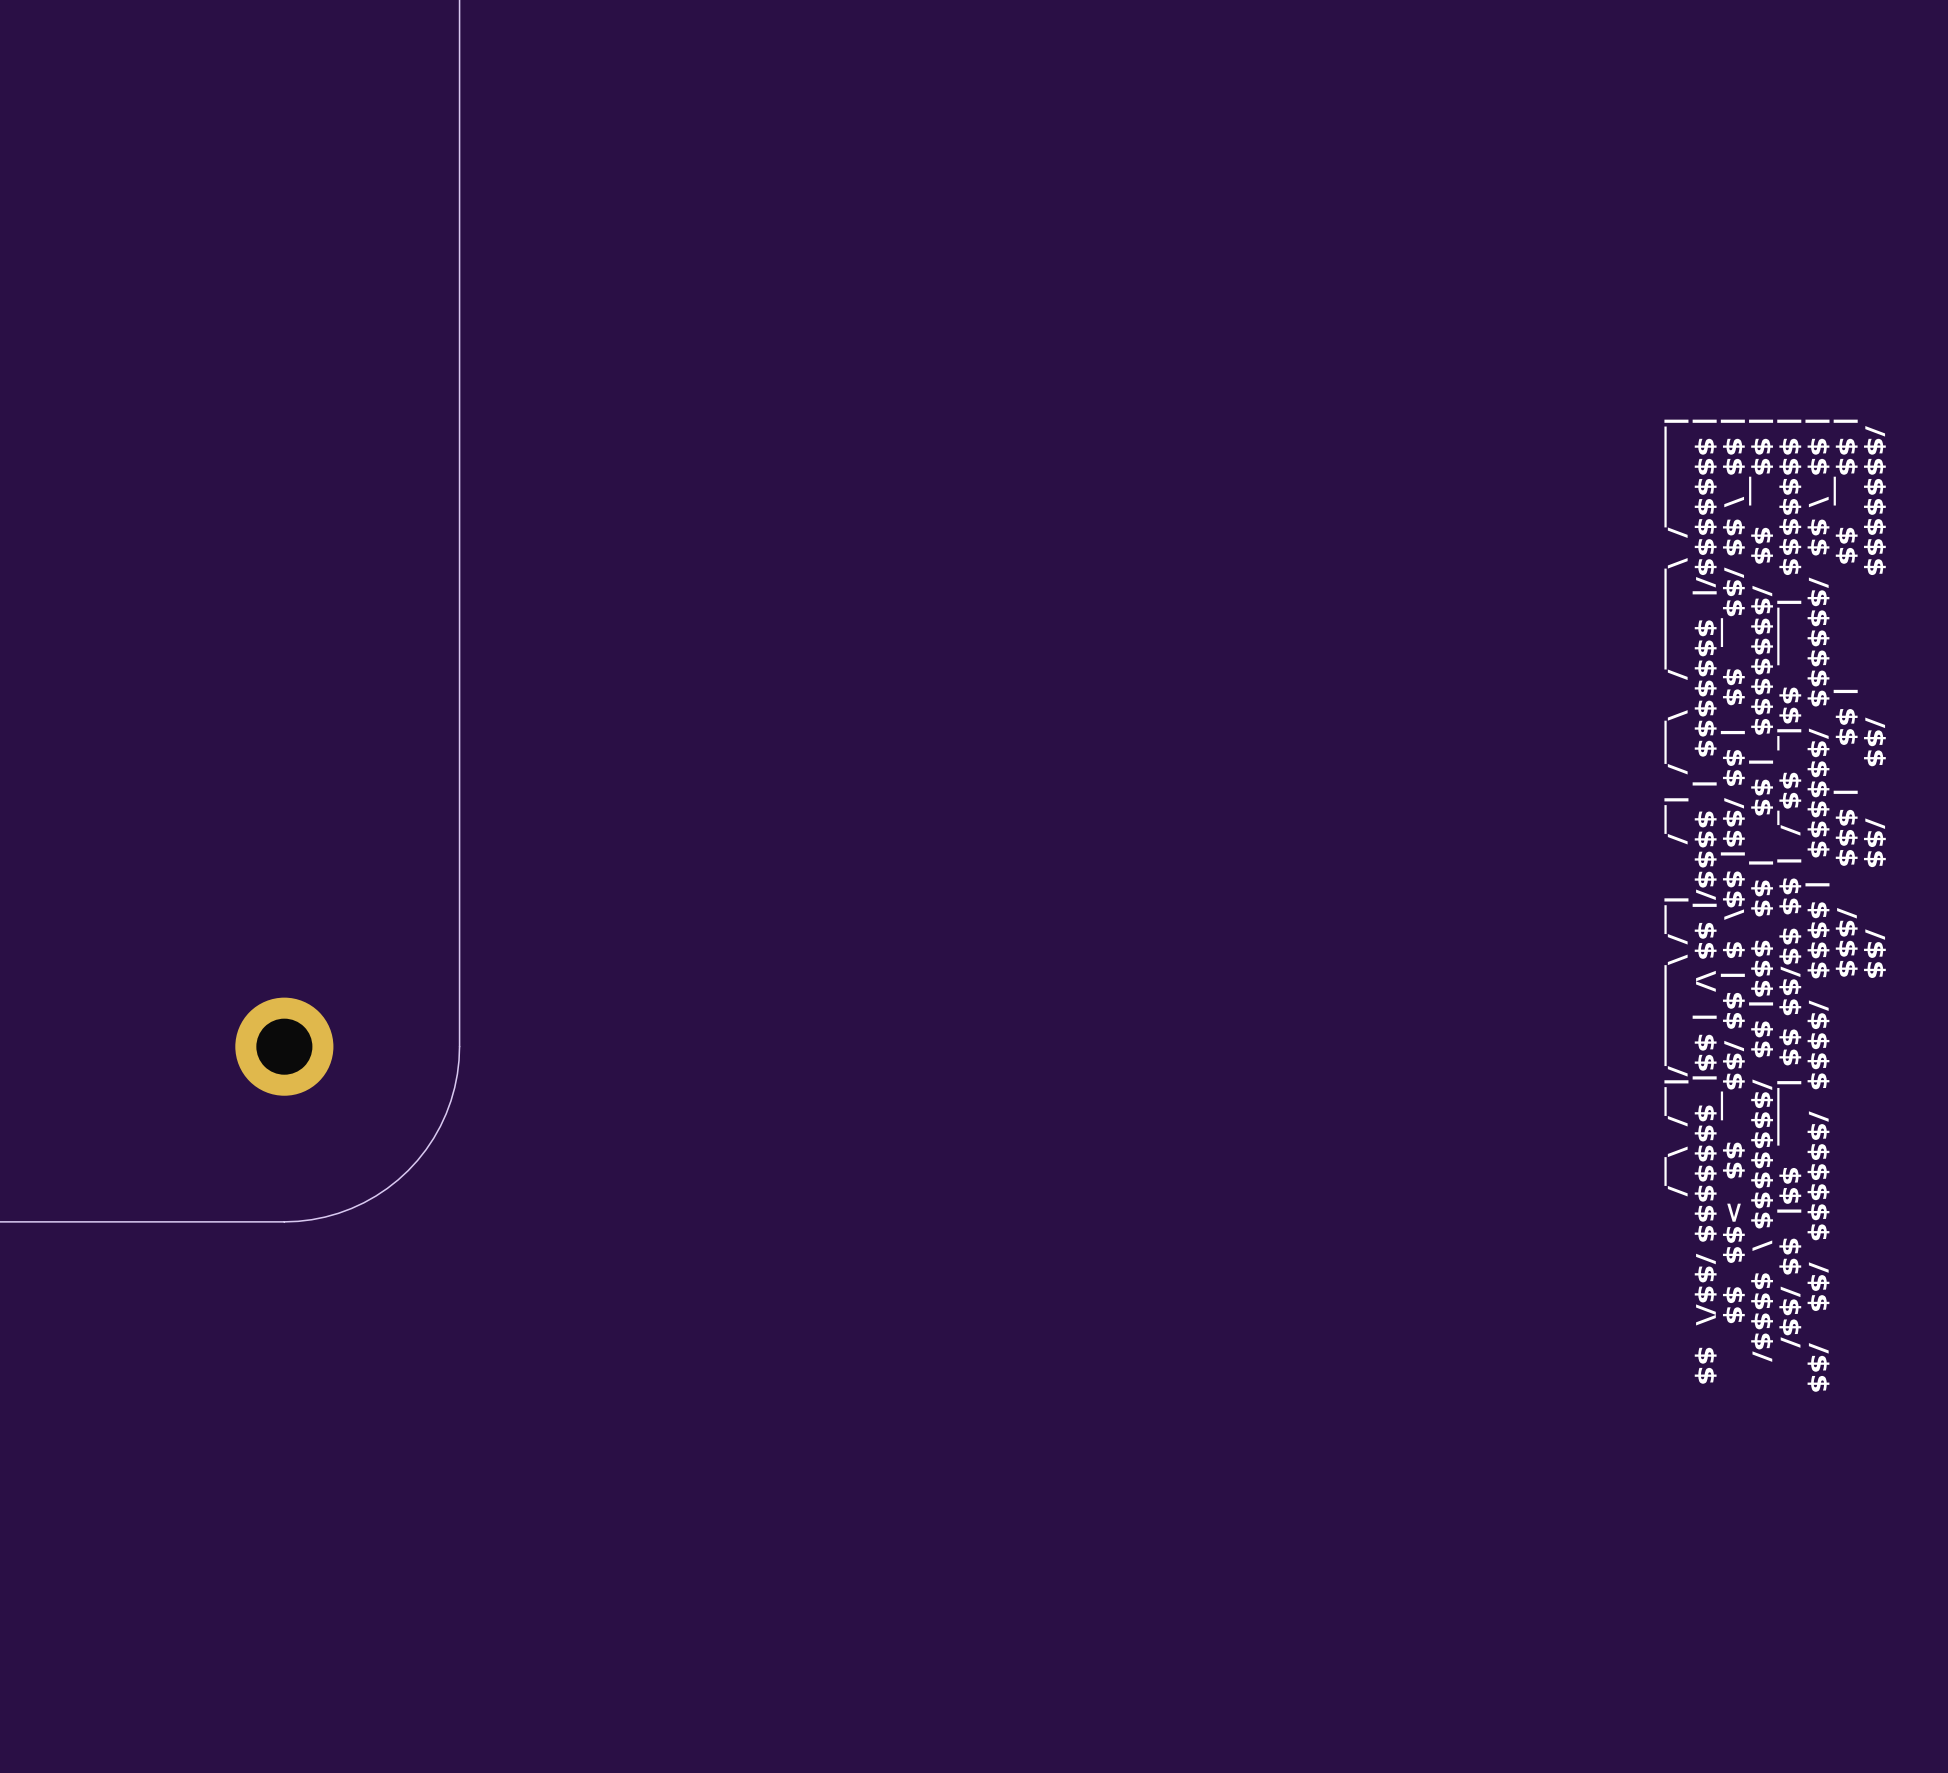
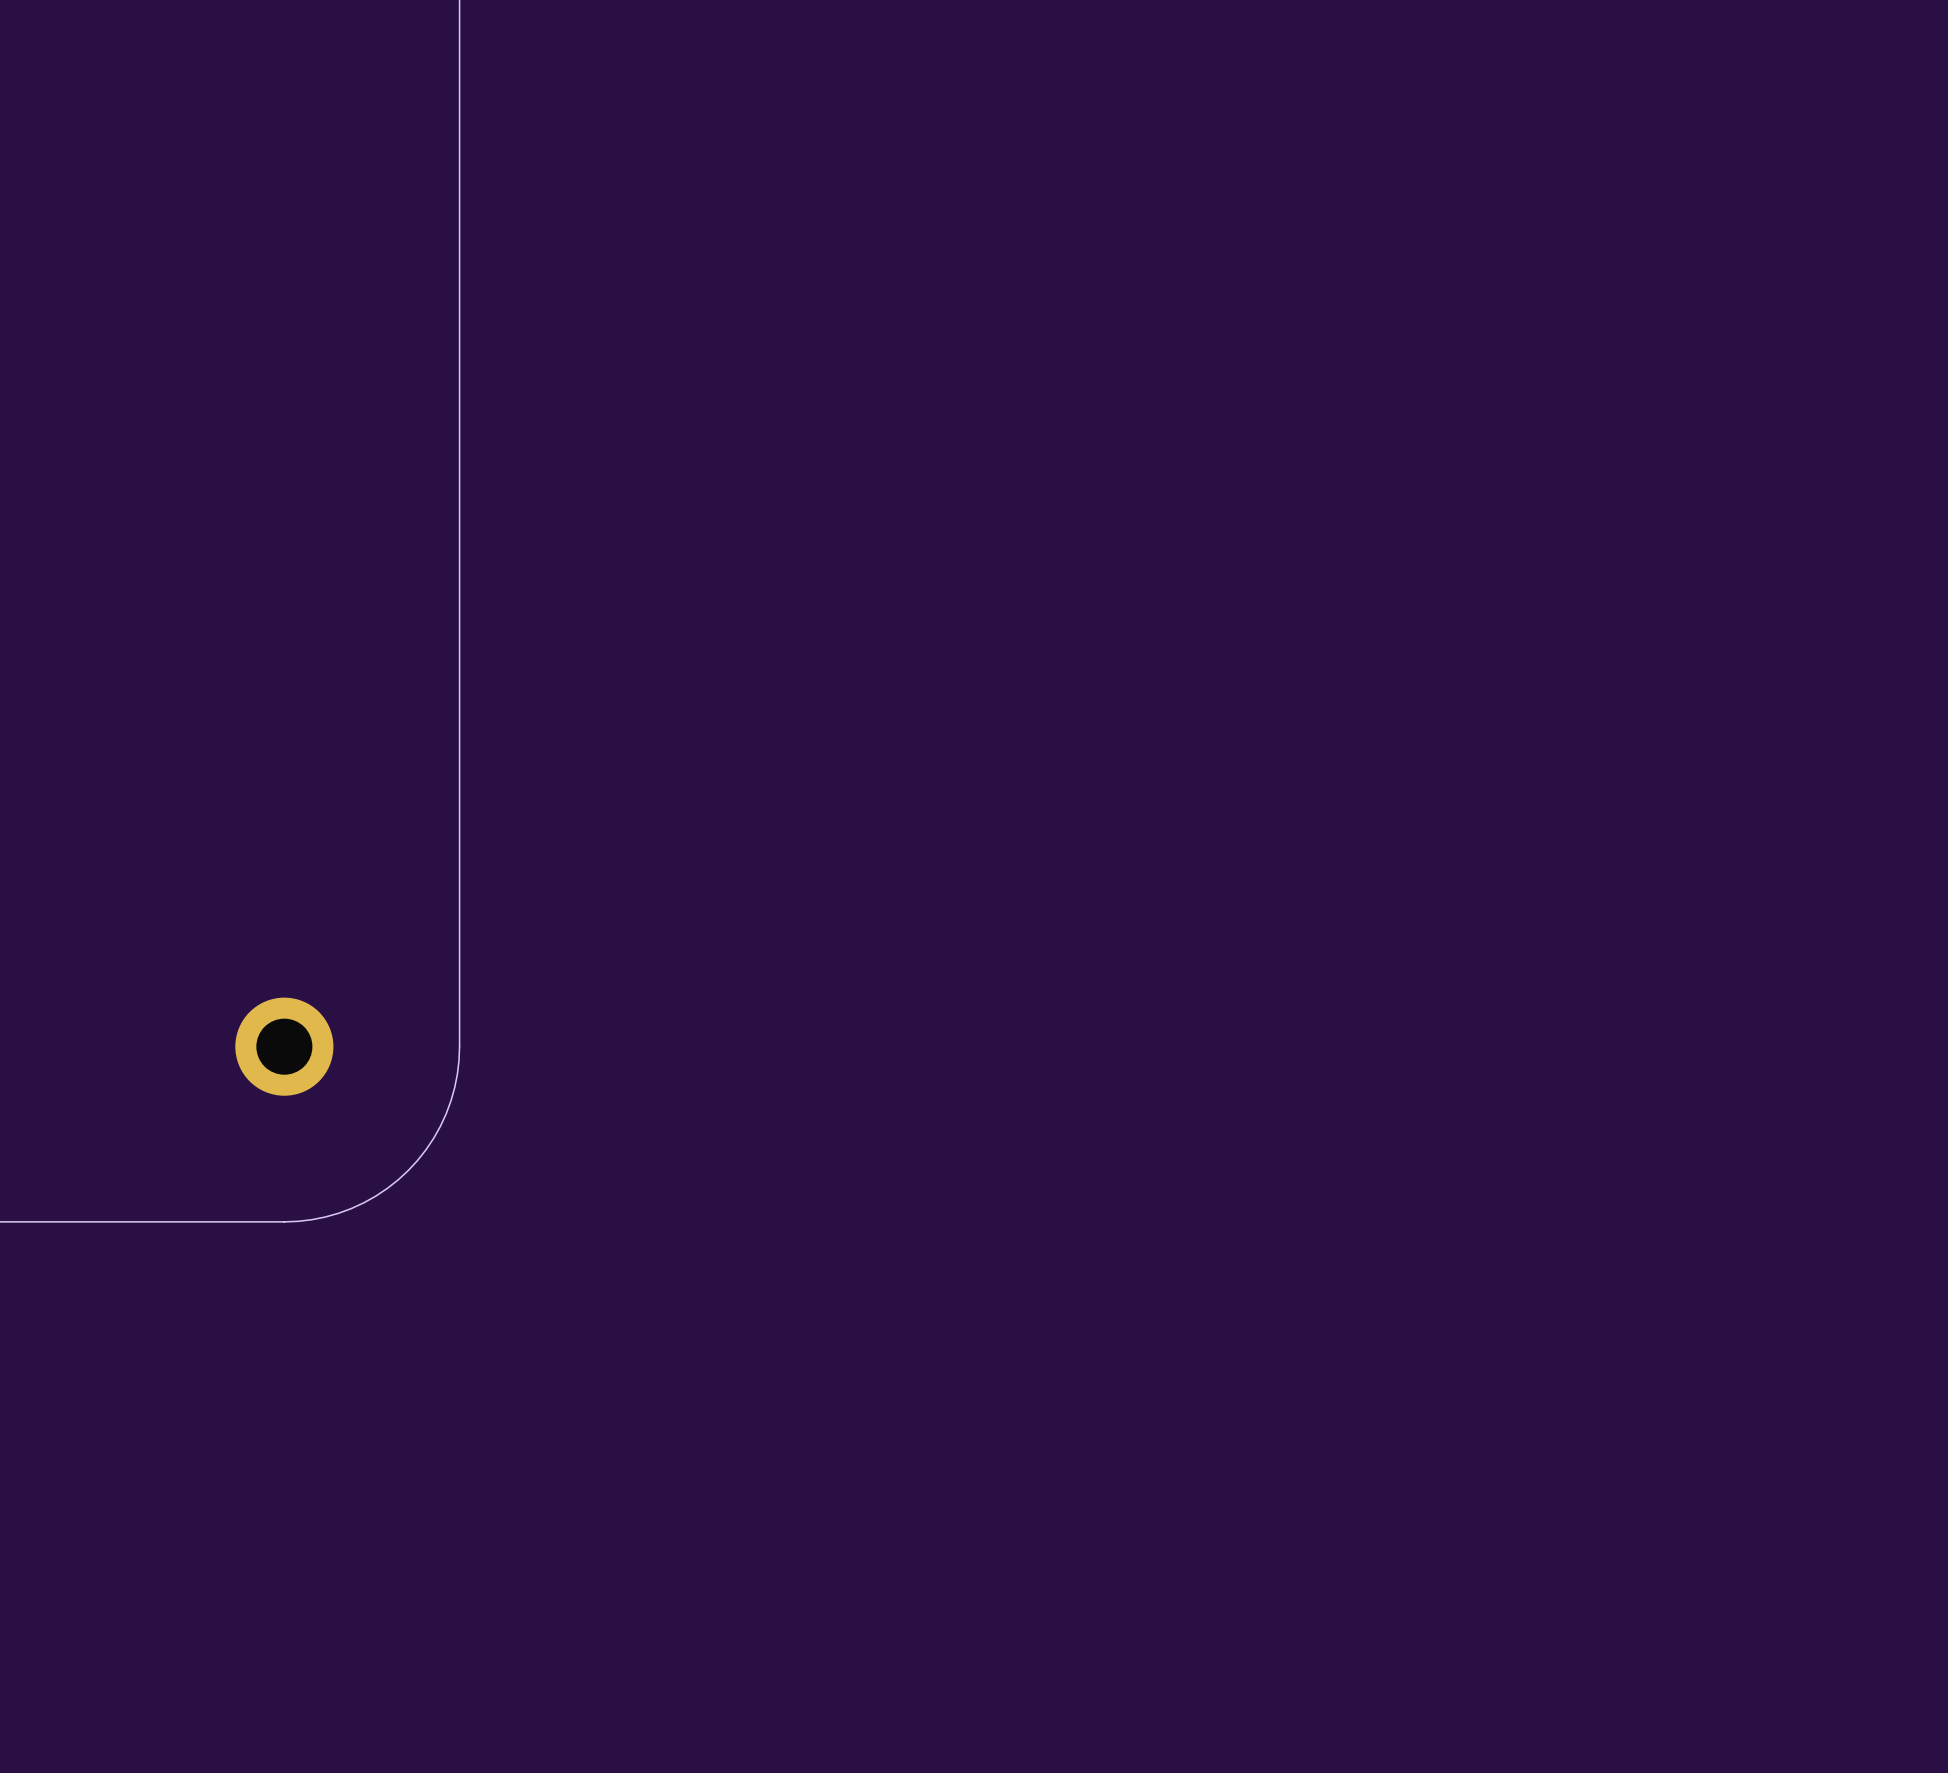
text: | $$__ $$ | $$ | $$$ /$$$ (1845, 698) -> none
text: /$$$$$$$ /$$ /$$ /$$ (1874, 702) -> none
text: |_______/ \_______/ \___/ |__/ |__/ \_______/|__/ \__/ (1676, 808) -> none
text: | $$ \ $$ /$$__ $$ | $$ /$$| $$\ $ | $$ /$$__ $$ >$$ $$ (1732, 871) -> none
text: | $$$$$$$ |____ $$|_ $$_/ | $$ $$/$$ $$ |____ $$| $$ /$$/ (1789, 883) -> none
text: | $$__ $$ /$$$$$$$ | $$ | $$ $$$| $$ /$$$$$$$ \ $$$$/ (1761, 890) -> none
text: | $$$$$$$/| $$$$$$$ | $$$$/| $$ \/ | $$| $$$$$$$ /$$/\ $$ (1704, 901) -> none
text: | $$ \ $$ /$$$$$$ /$$$$$$ | $$$$ /$$$$ /$$$$$$ /$$ /$$ (1817, 905) -> none

